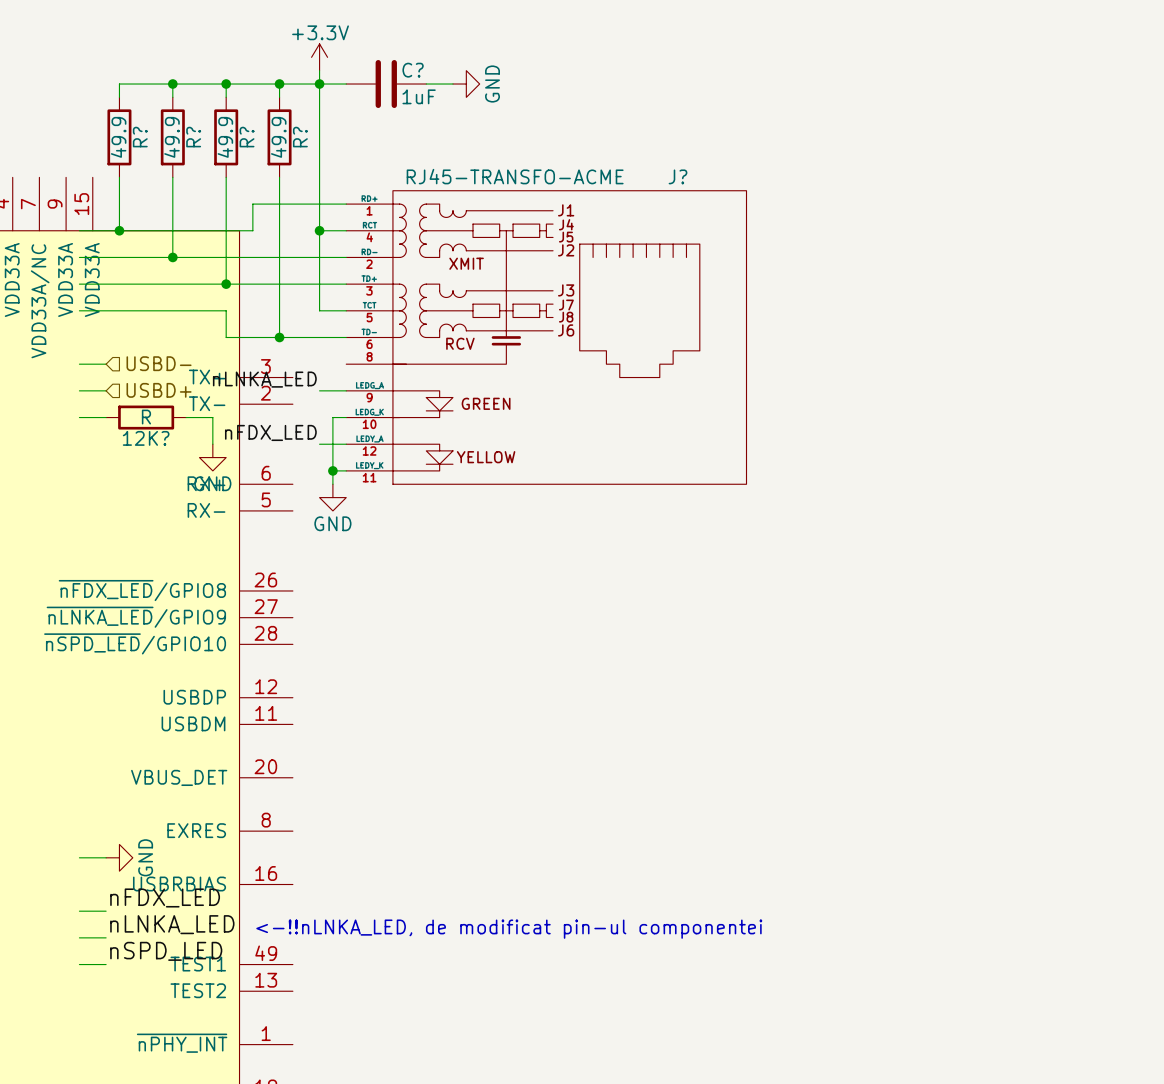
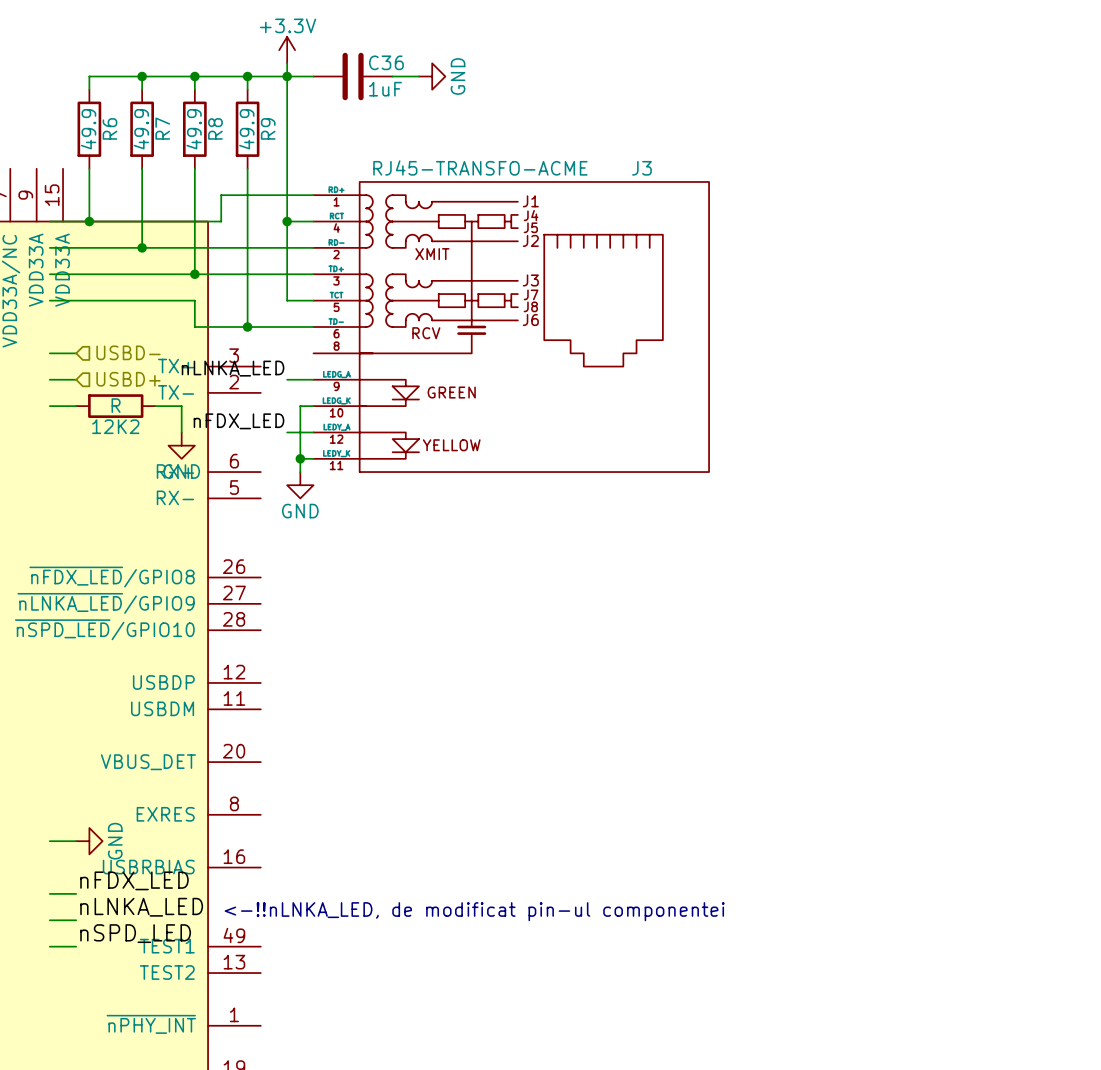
C? name: C? (413, 70) -> C36 (386, 62)
R? name: R? (140, 137) -> R6 (109, 128)
R? name: R? (193, 137) -> R7 (162, 128)
R? name: R? (247, 137) -> R8 (215, 128)
R? name: R? (300, 137) -> R9 (268, 128)
J? name: J? (677, 176) -> J3 (641, 168)
12K? name: 12K? (146, 438) -> 12K2 (115, 426)

